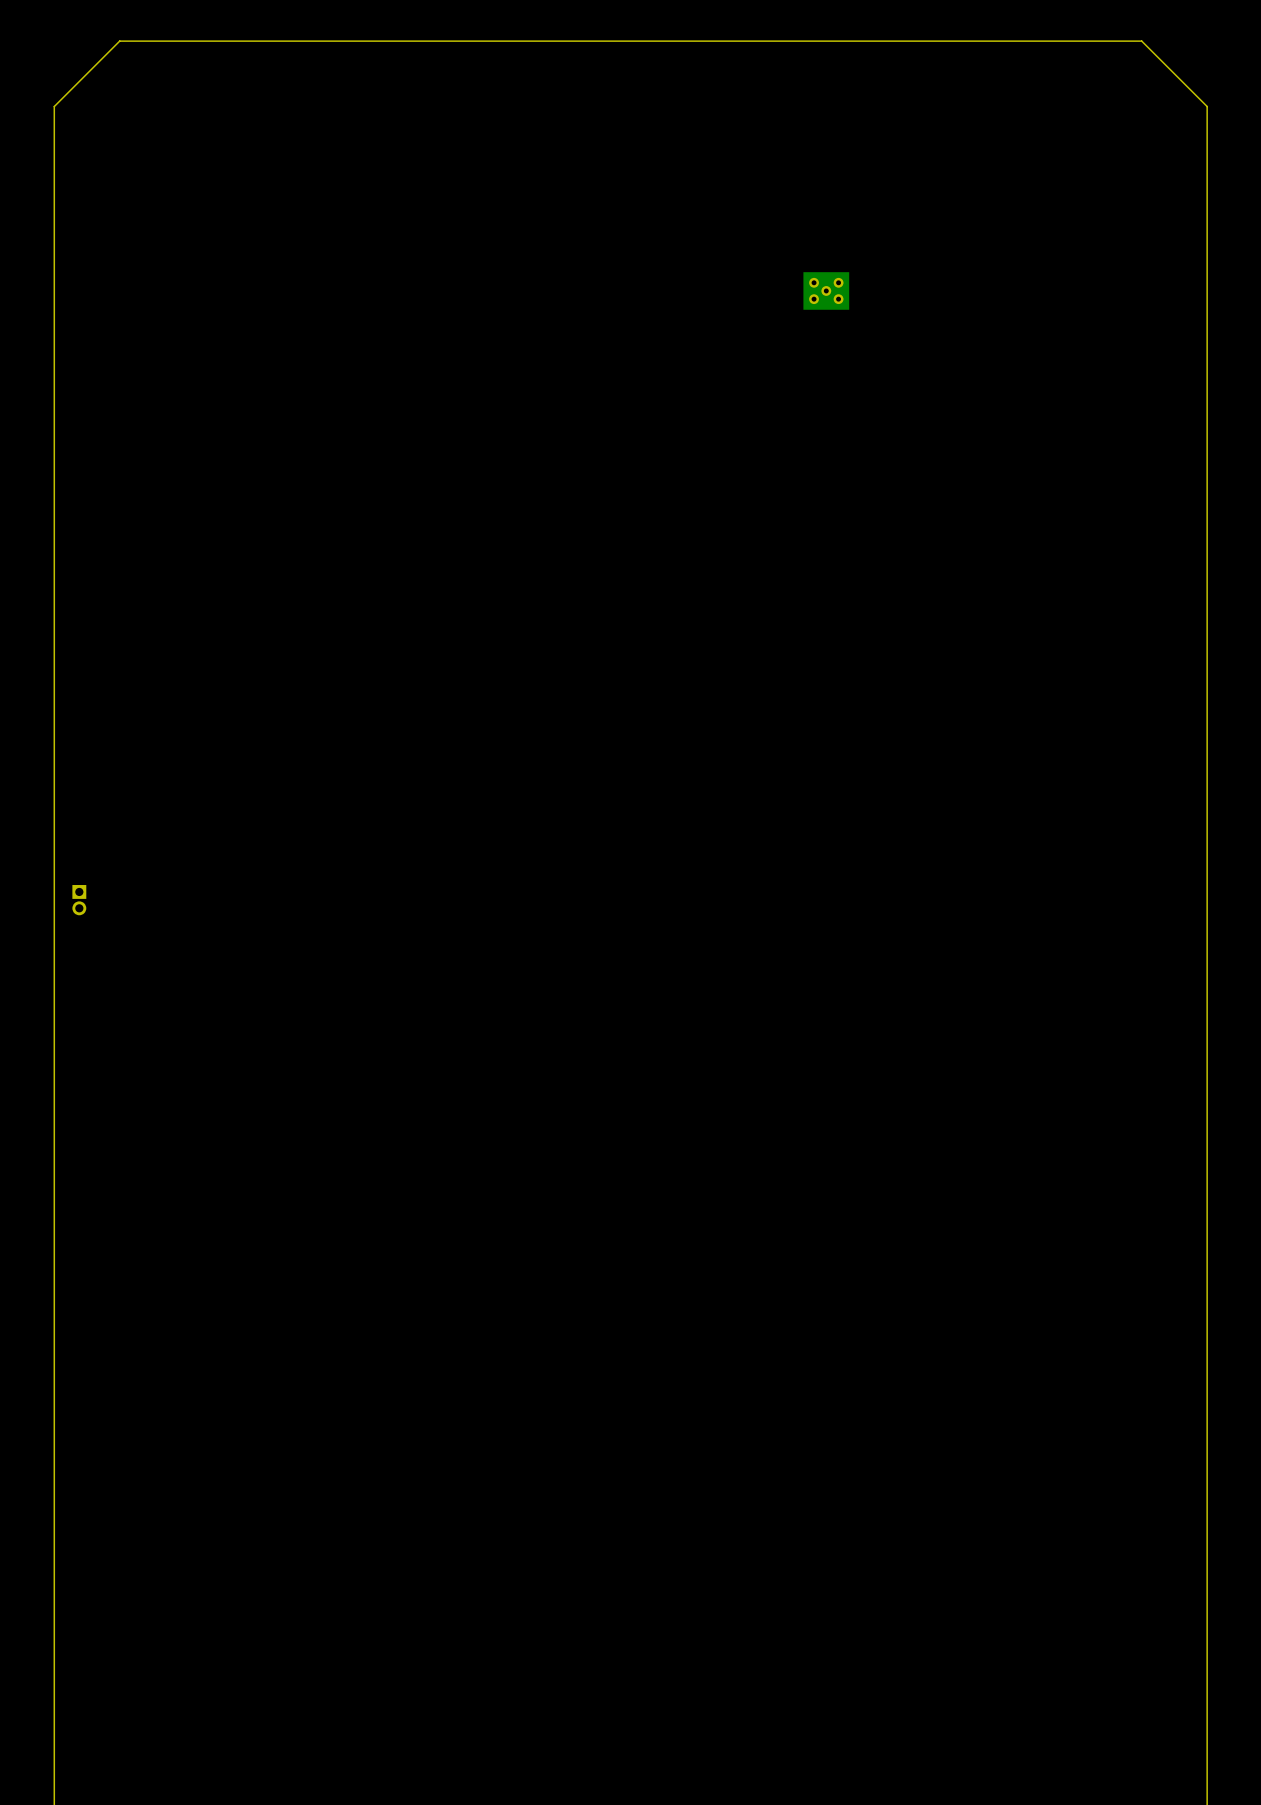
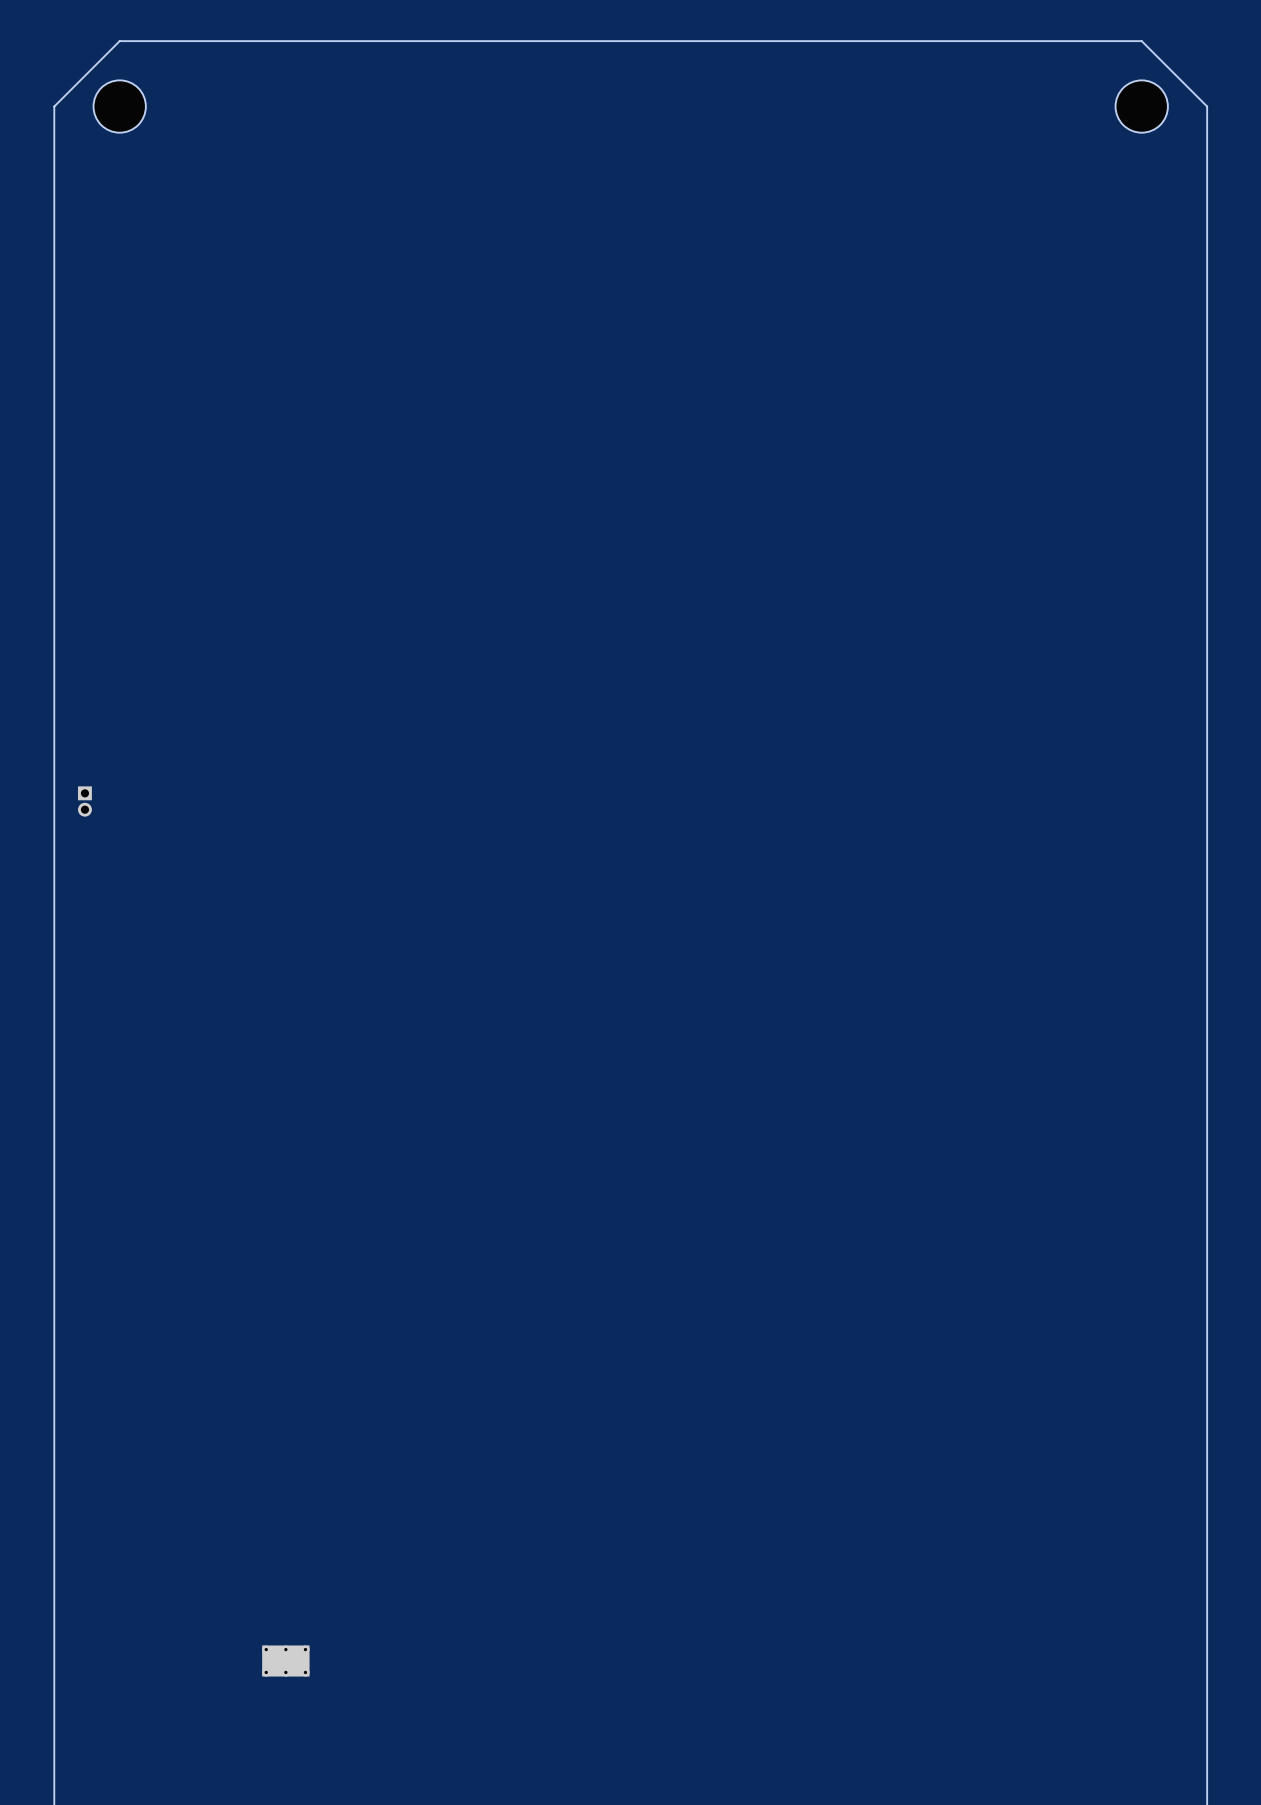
part: none -> (119, 106)
part: none -> (1141, 106)
part: (826, 290) -> none
part position: (79, 900) -> (84, 801)
part: none -> (285, 1661)

